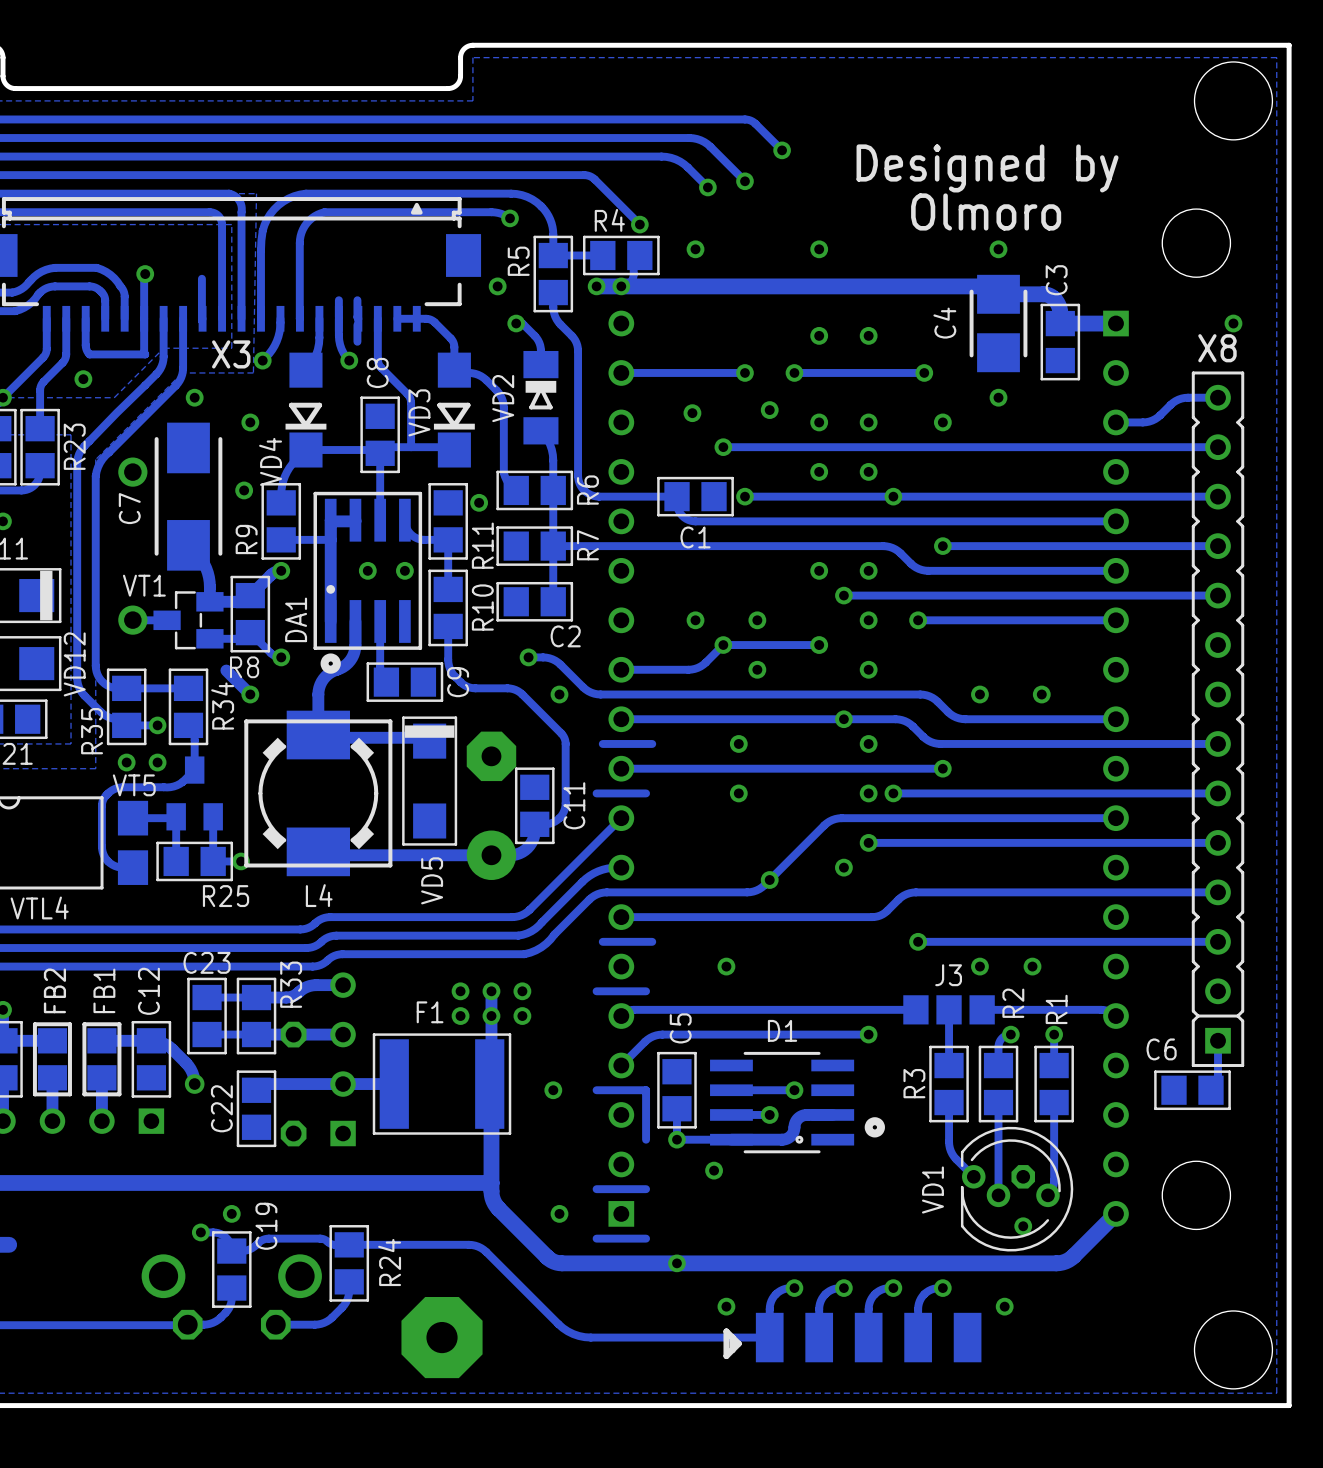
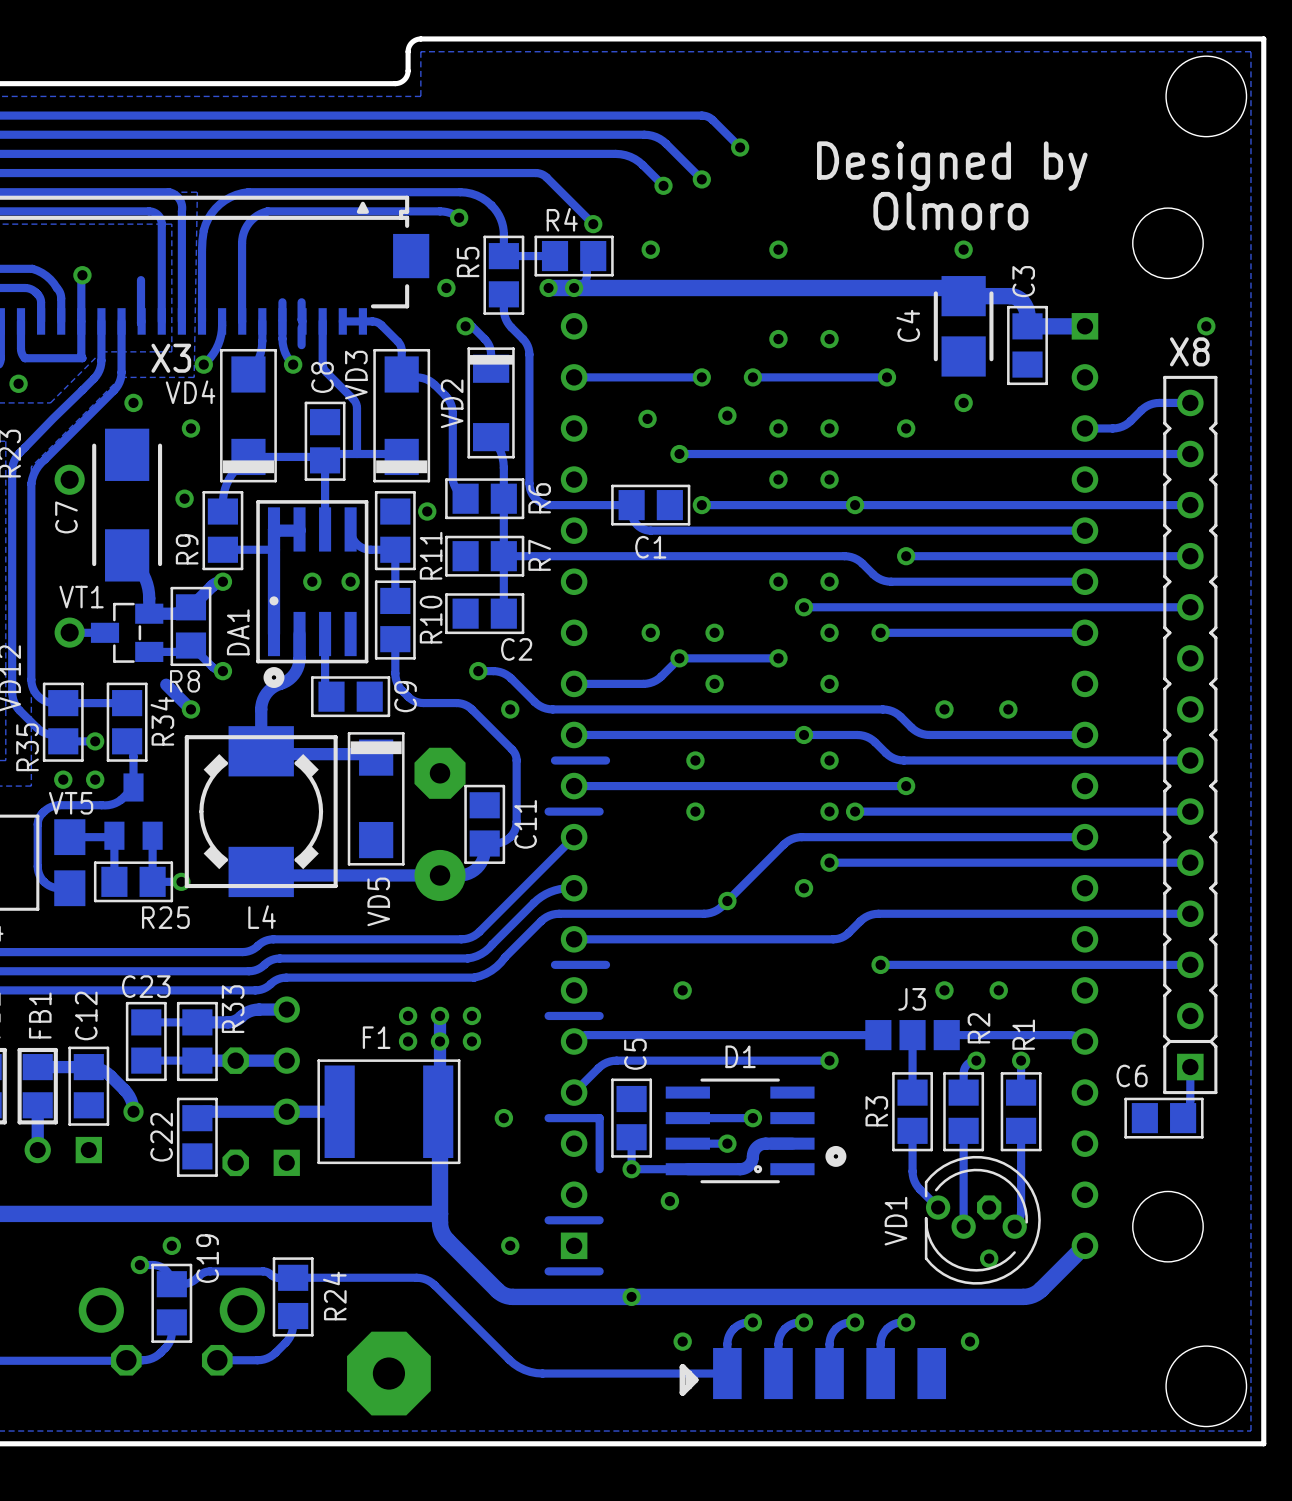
VD2 footprint: [523, 350, 559, 445] -> [467, 347, 515, 459]
VD4 footprint: [285, 352, 327, 468] -> [220, 348, 277, 483]
VD3 footprint: [433, 352, 475, 468] -> [373, 348, 431, 483]
VD3 name position: VD3 (419, 412) -> VD3 (356, 375)
VD4 name position: VD4 (270, 461) -> VD4 (190, 392)

